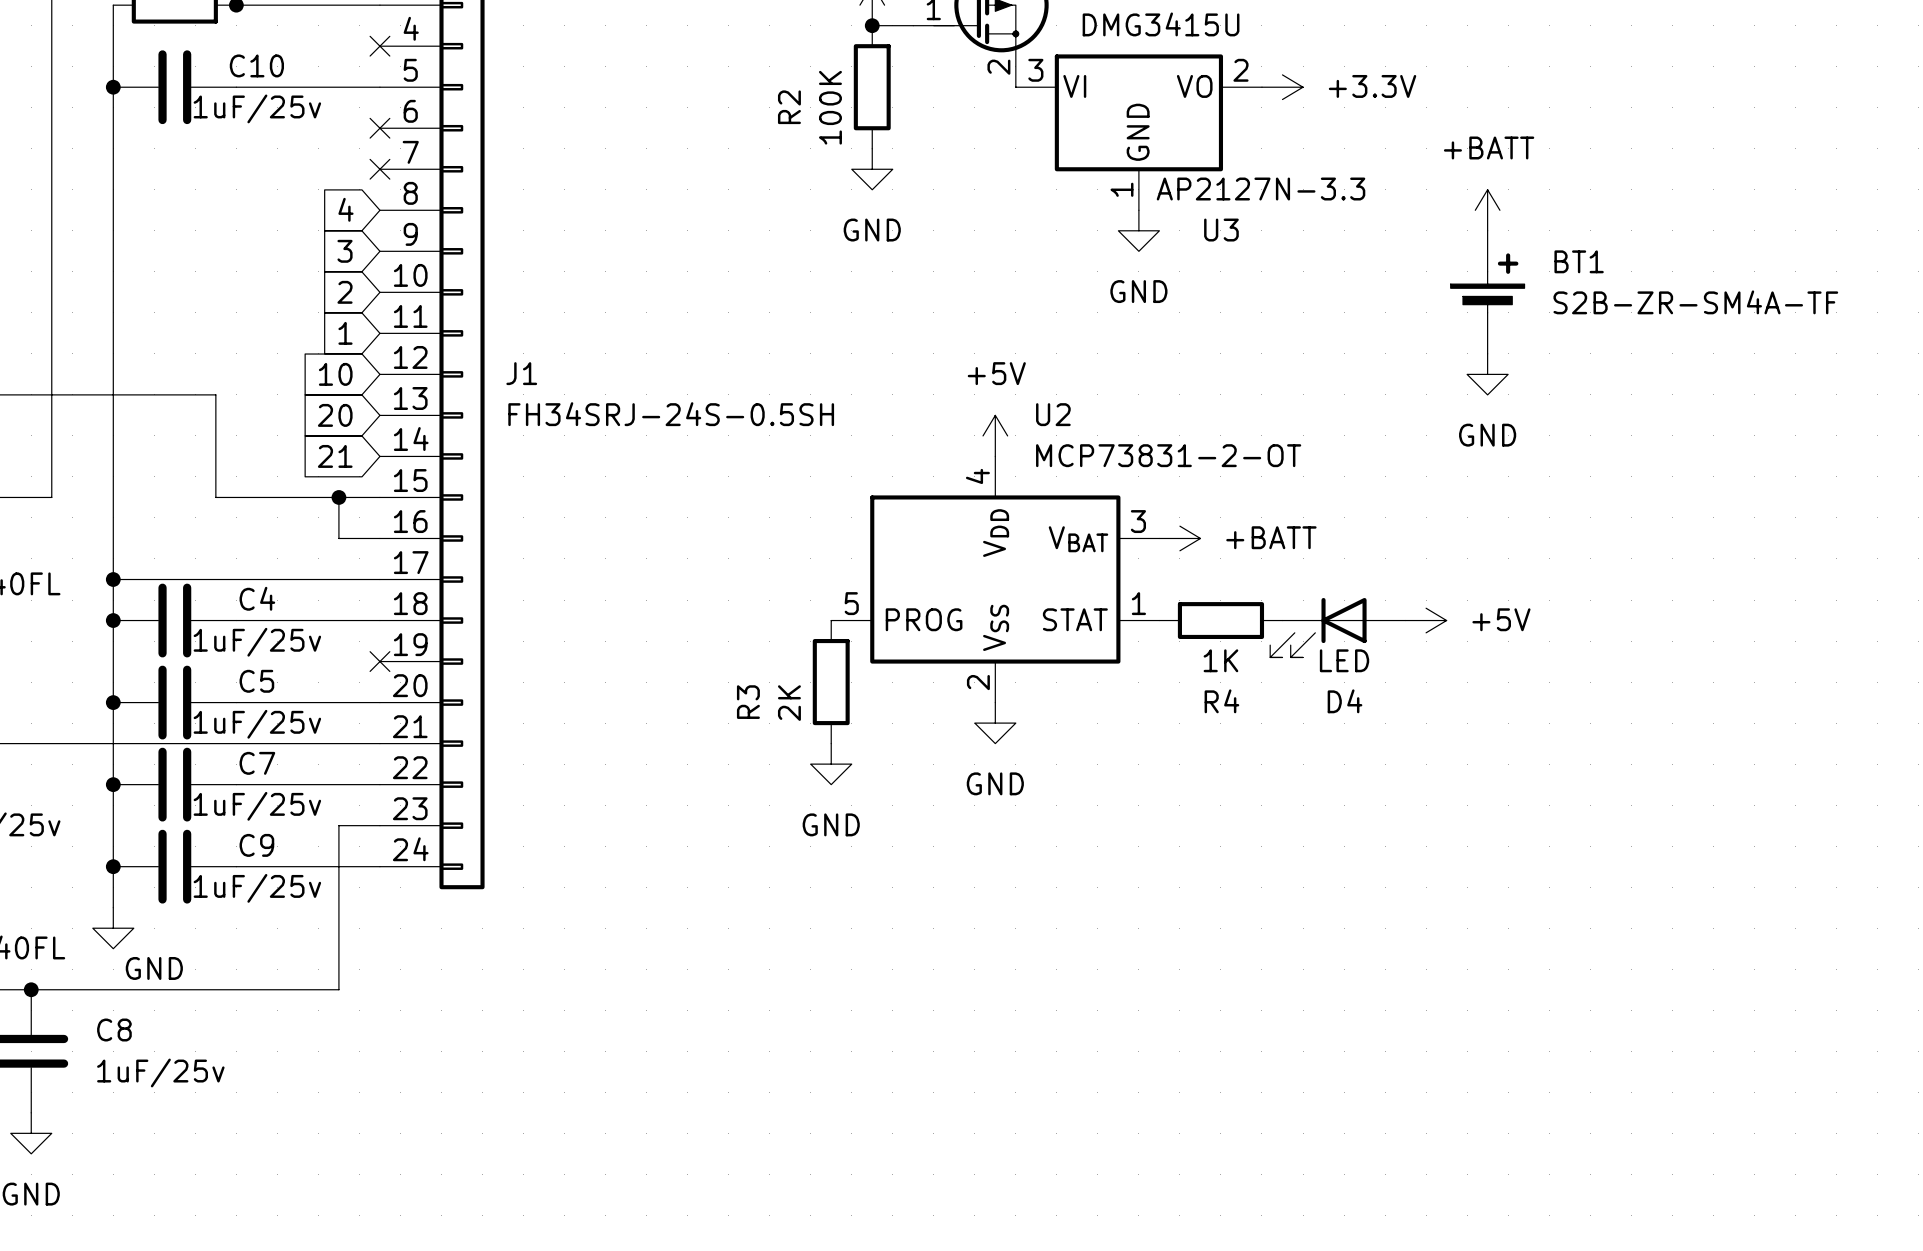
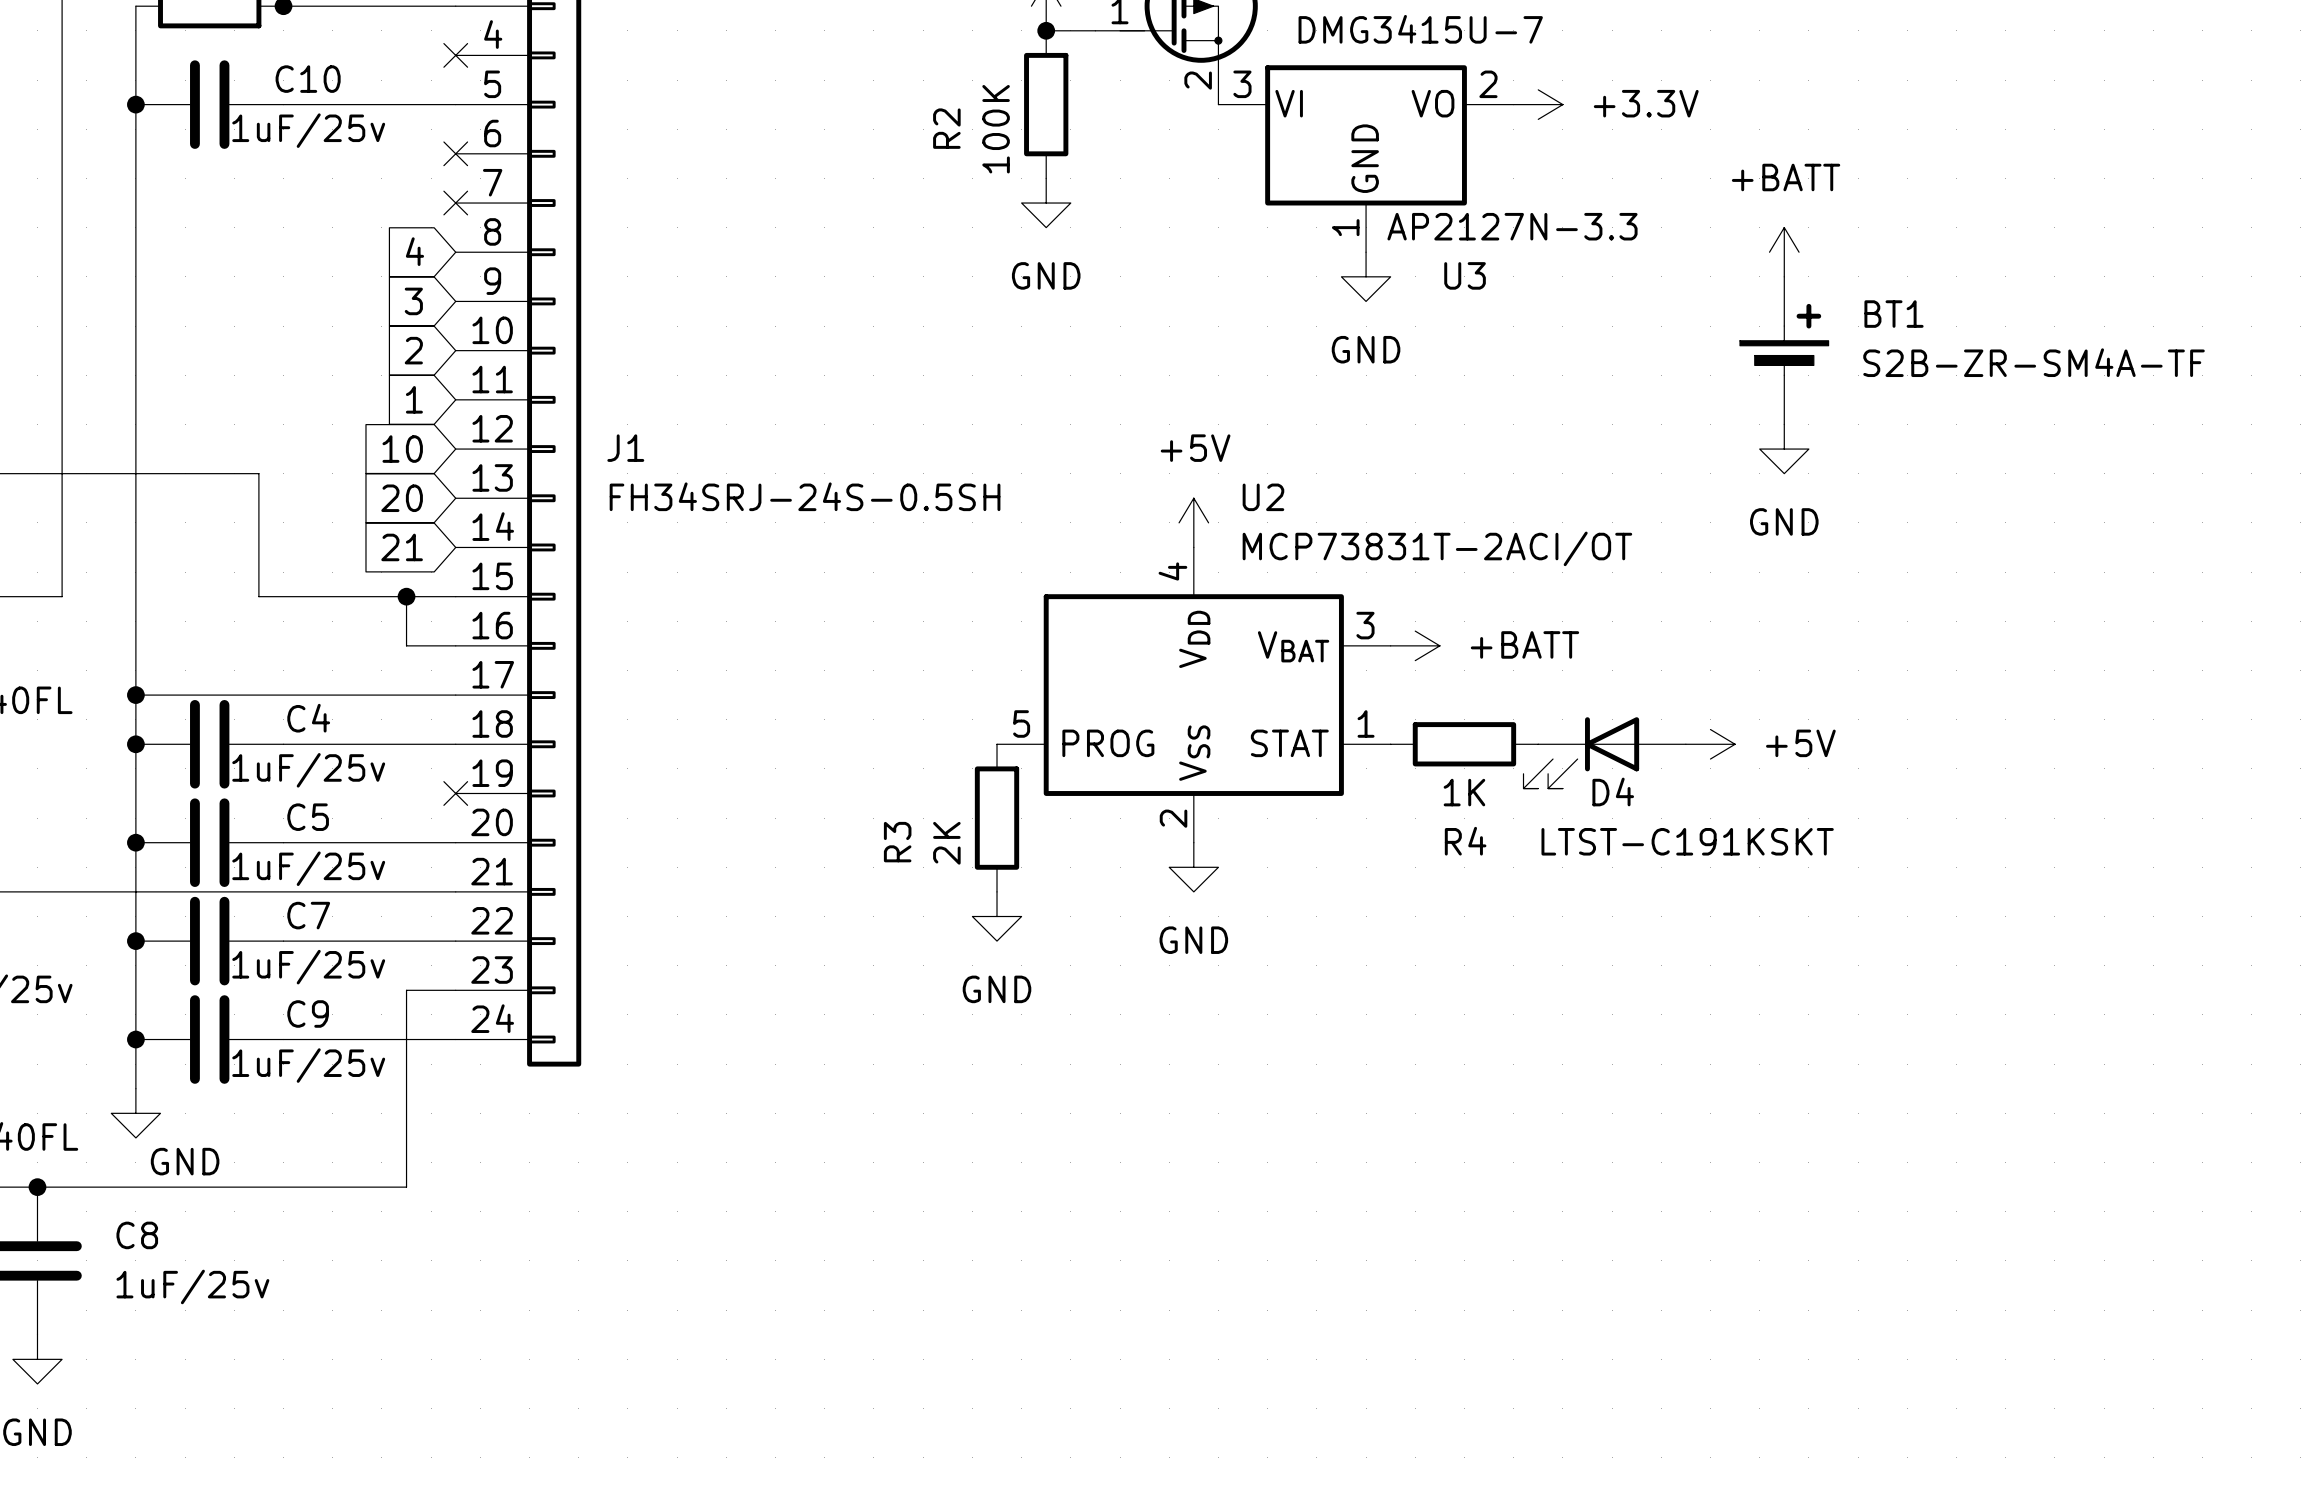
part value: DMG3415U (1161, 24) -> DMG3415U-7 (1420, 29)
U2 value: MCP73831-2-OT (1168, 455) -> MCP73831T-2ACI/OT (1437, 548)
D4 value: LED (1344, 660) -> LTST-C191KSKT (1687, 841)
D4 name position: D4 (1345, 701) -> D4 (1613, 791)

